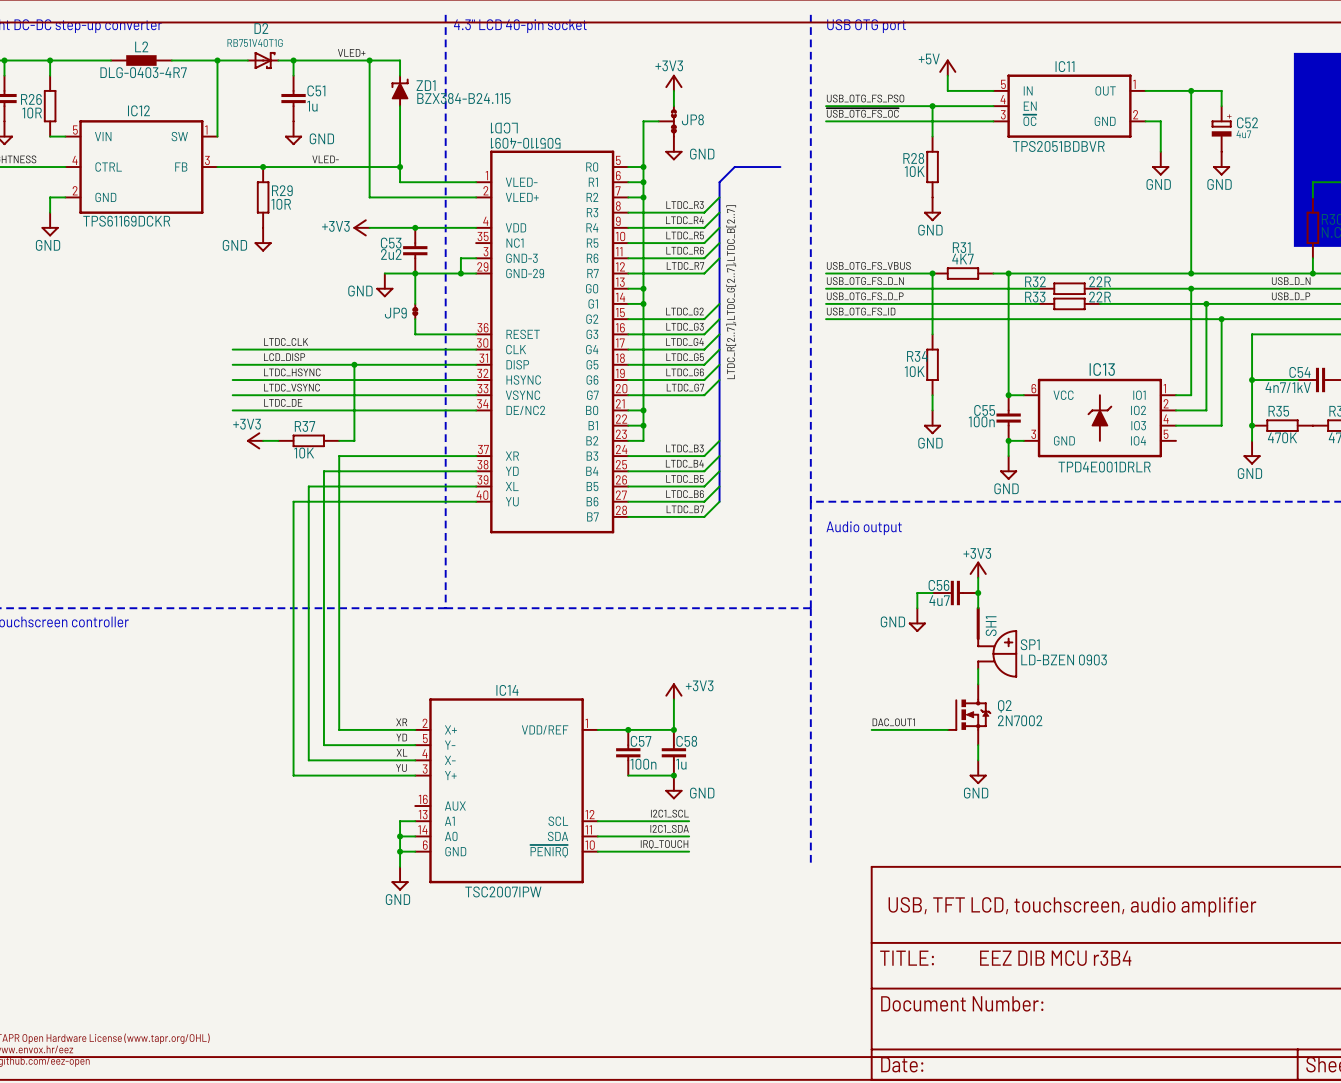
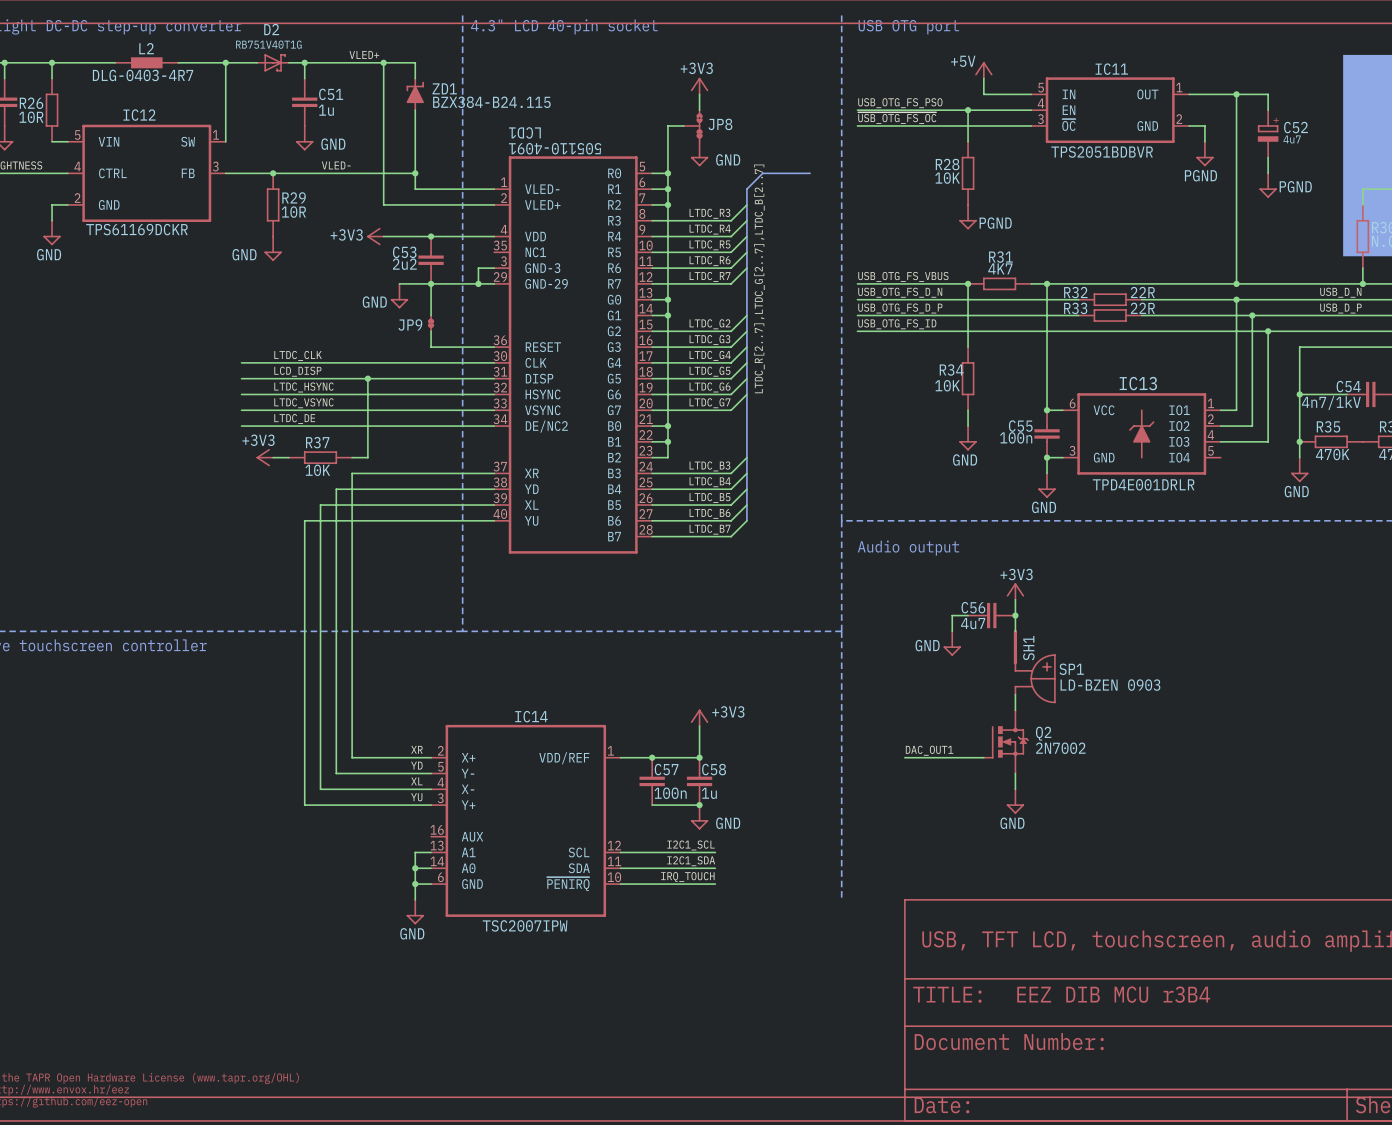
power symbol: none -> PGND (1204, 154)
power symbol: GND (1160, 163) -> none
power symbol: GND (1221, 163) -> none
power symbol: none -> PGND (1268, 185)
power symbol: GND (932, 209) -> PGND (968, 217)

